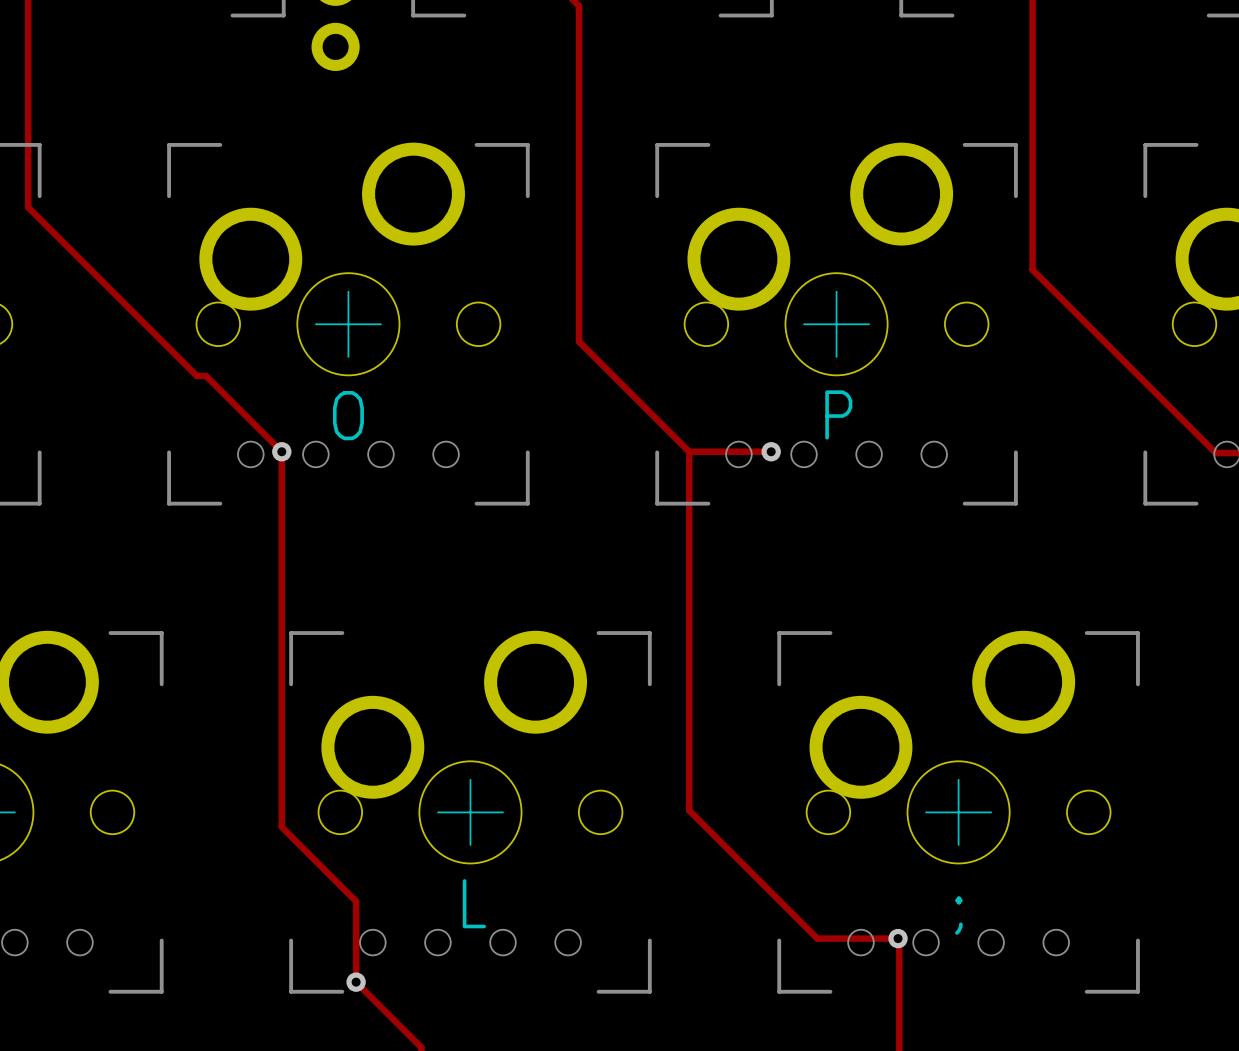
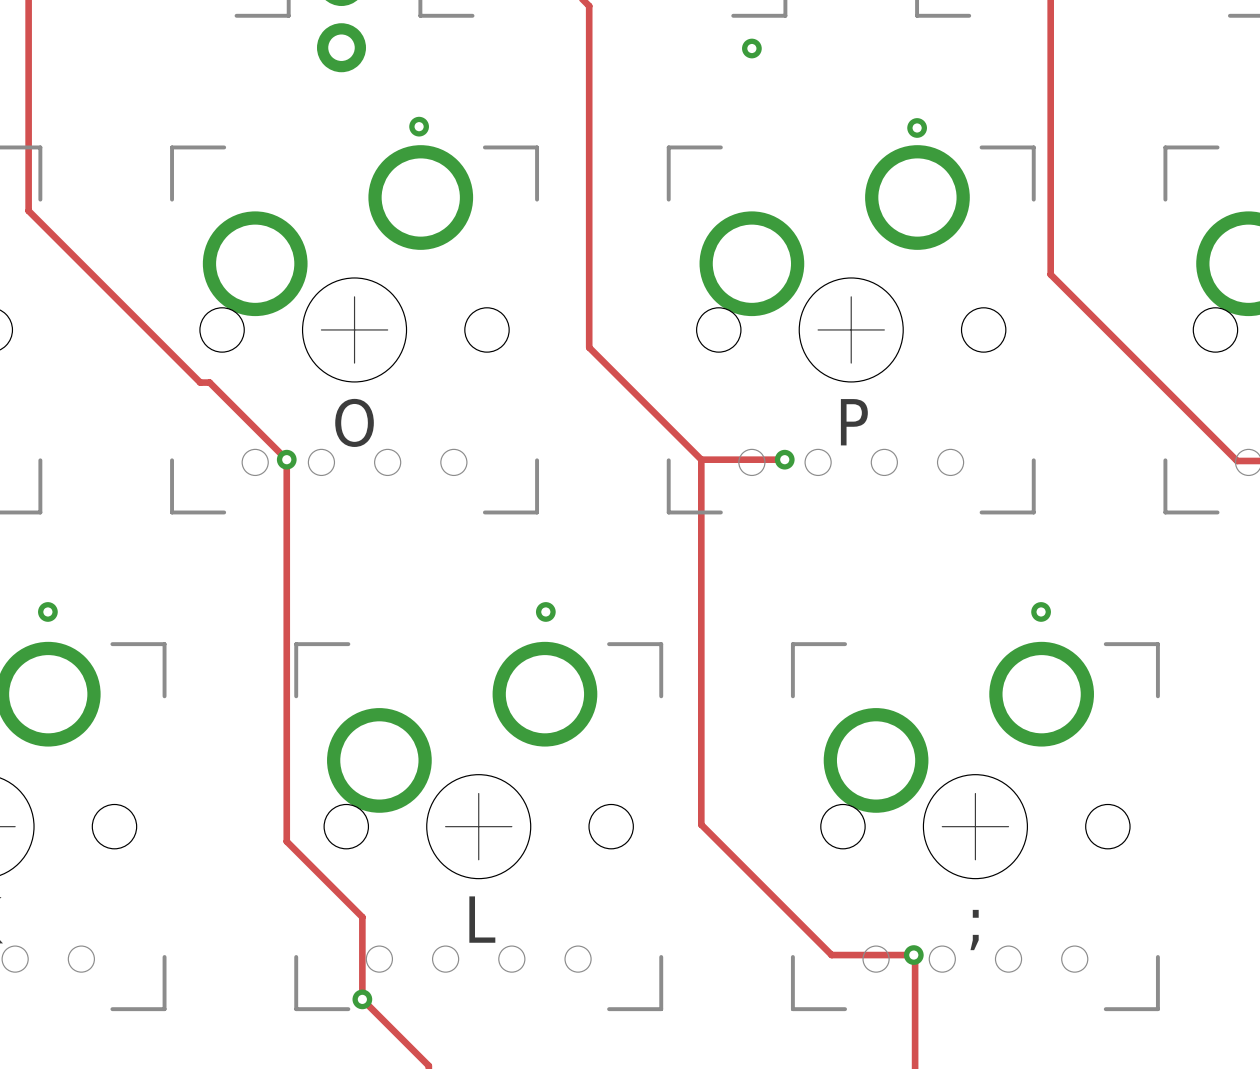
via: none -> (751, 48)
via: none -> (419, 126)
via: none -> (917, 127)
via: none -> (47, 611)
via: none -> (545, 611)
via: none -> (1041, 611)

